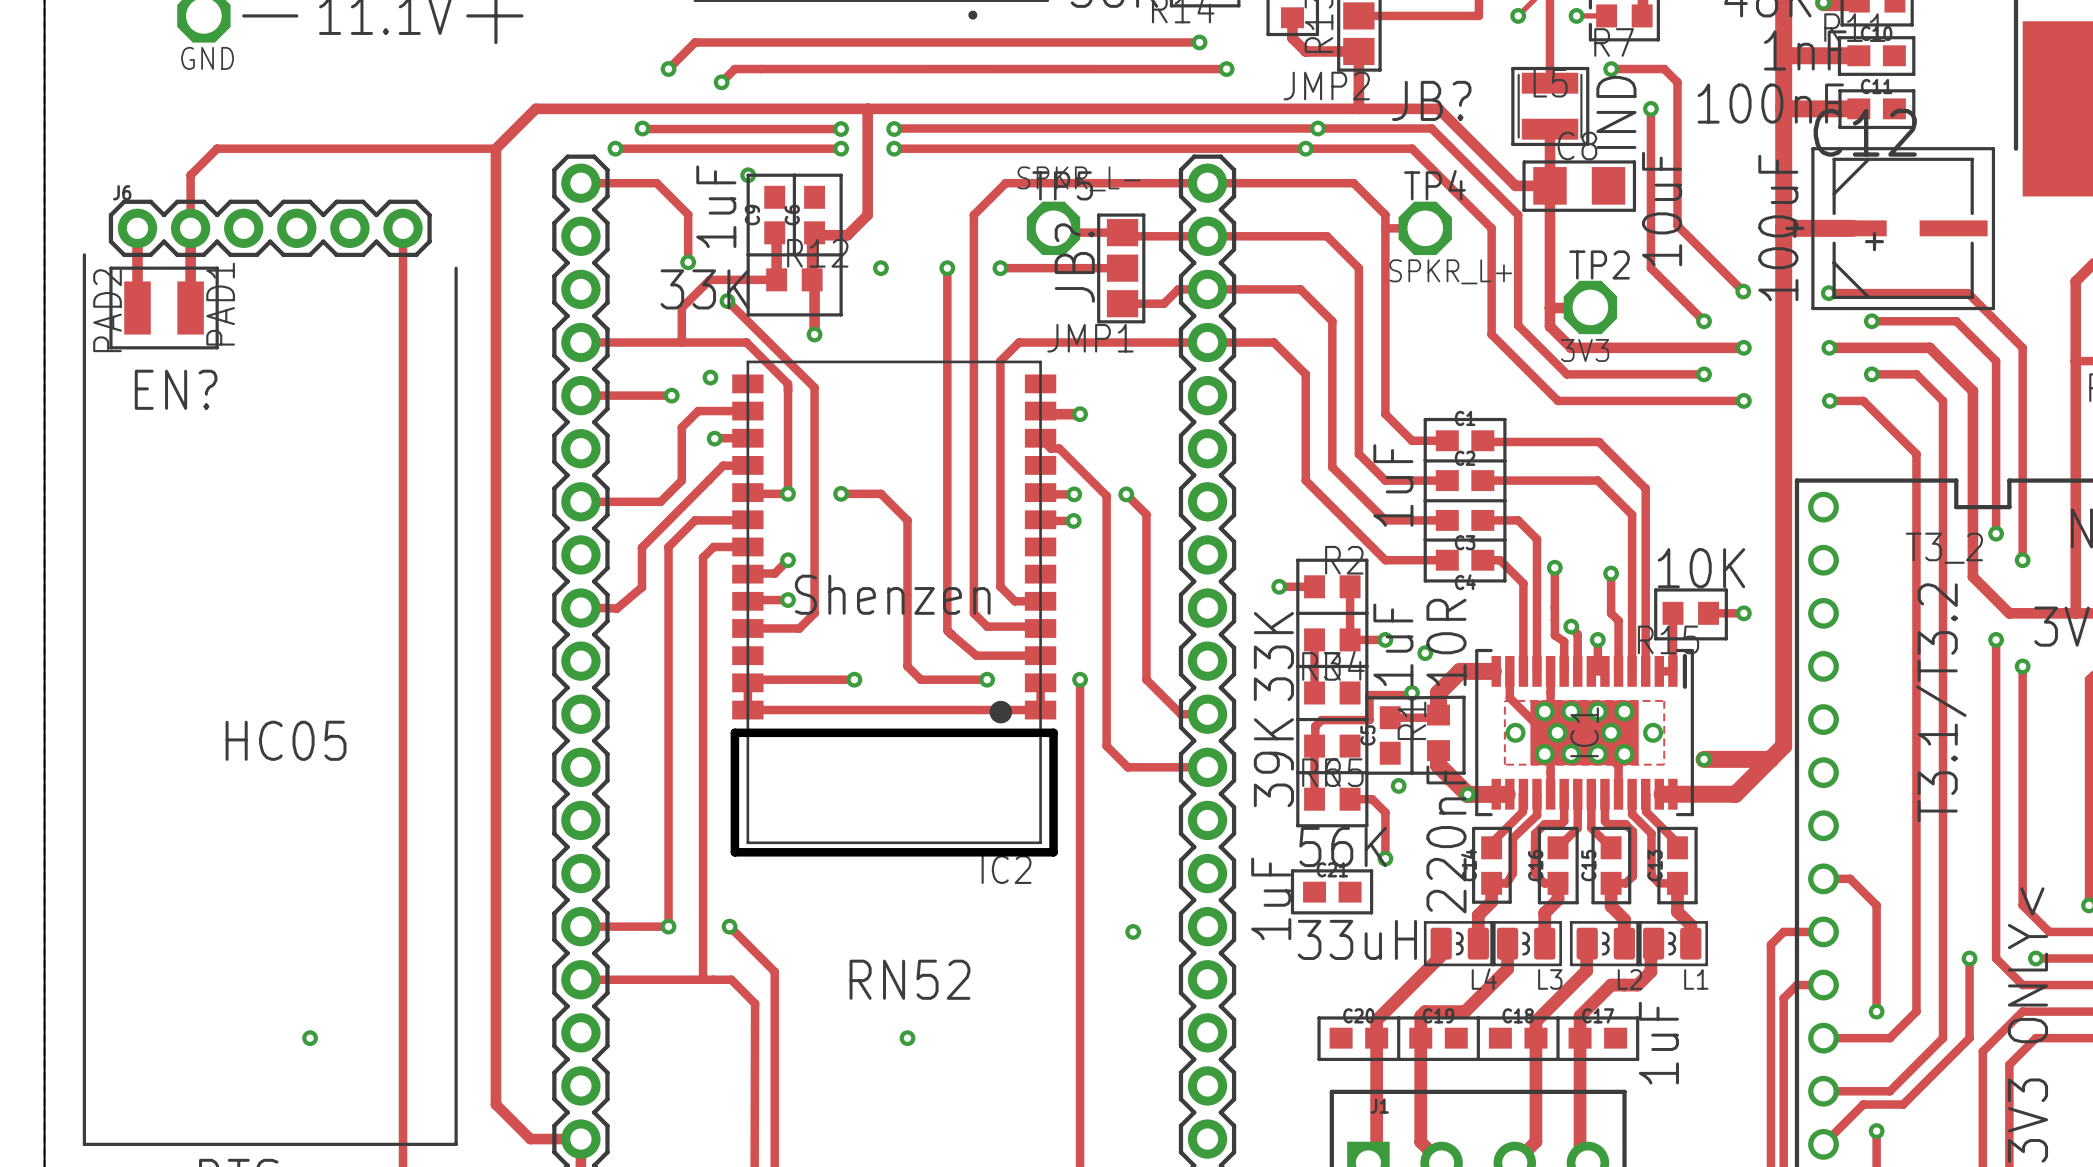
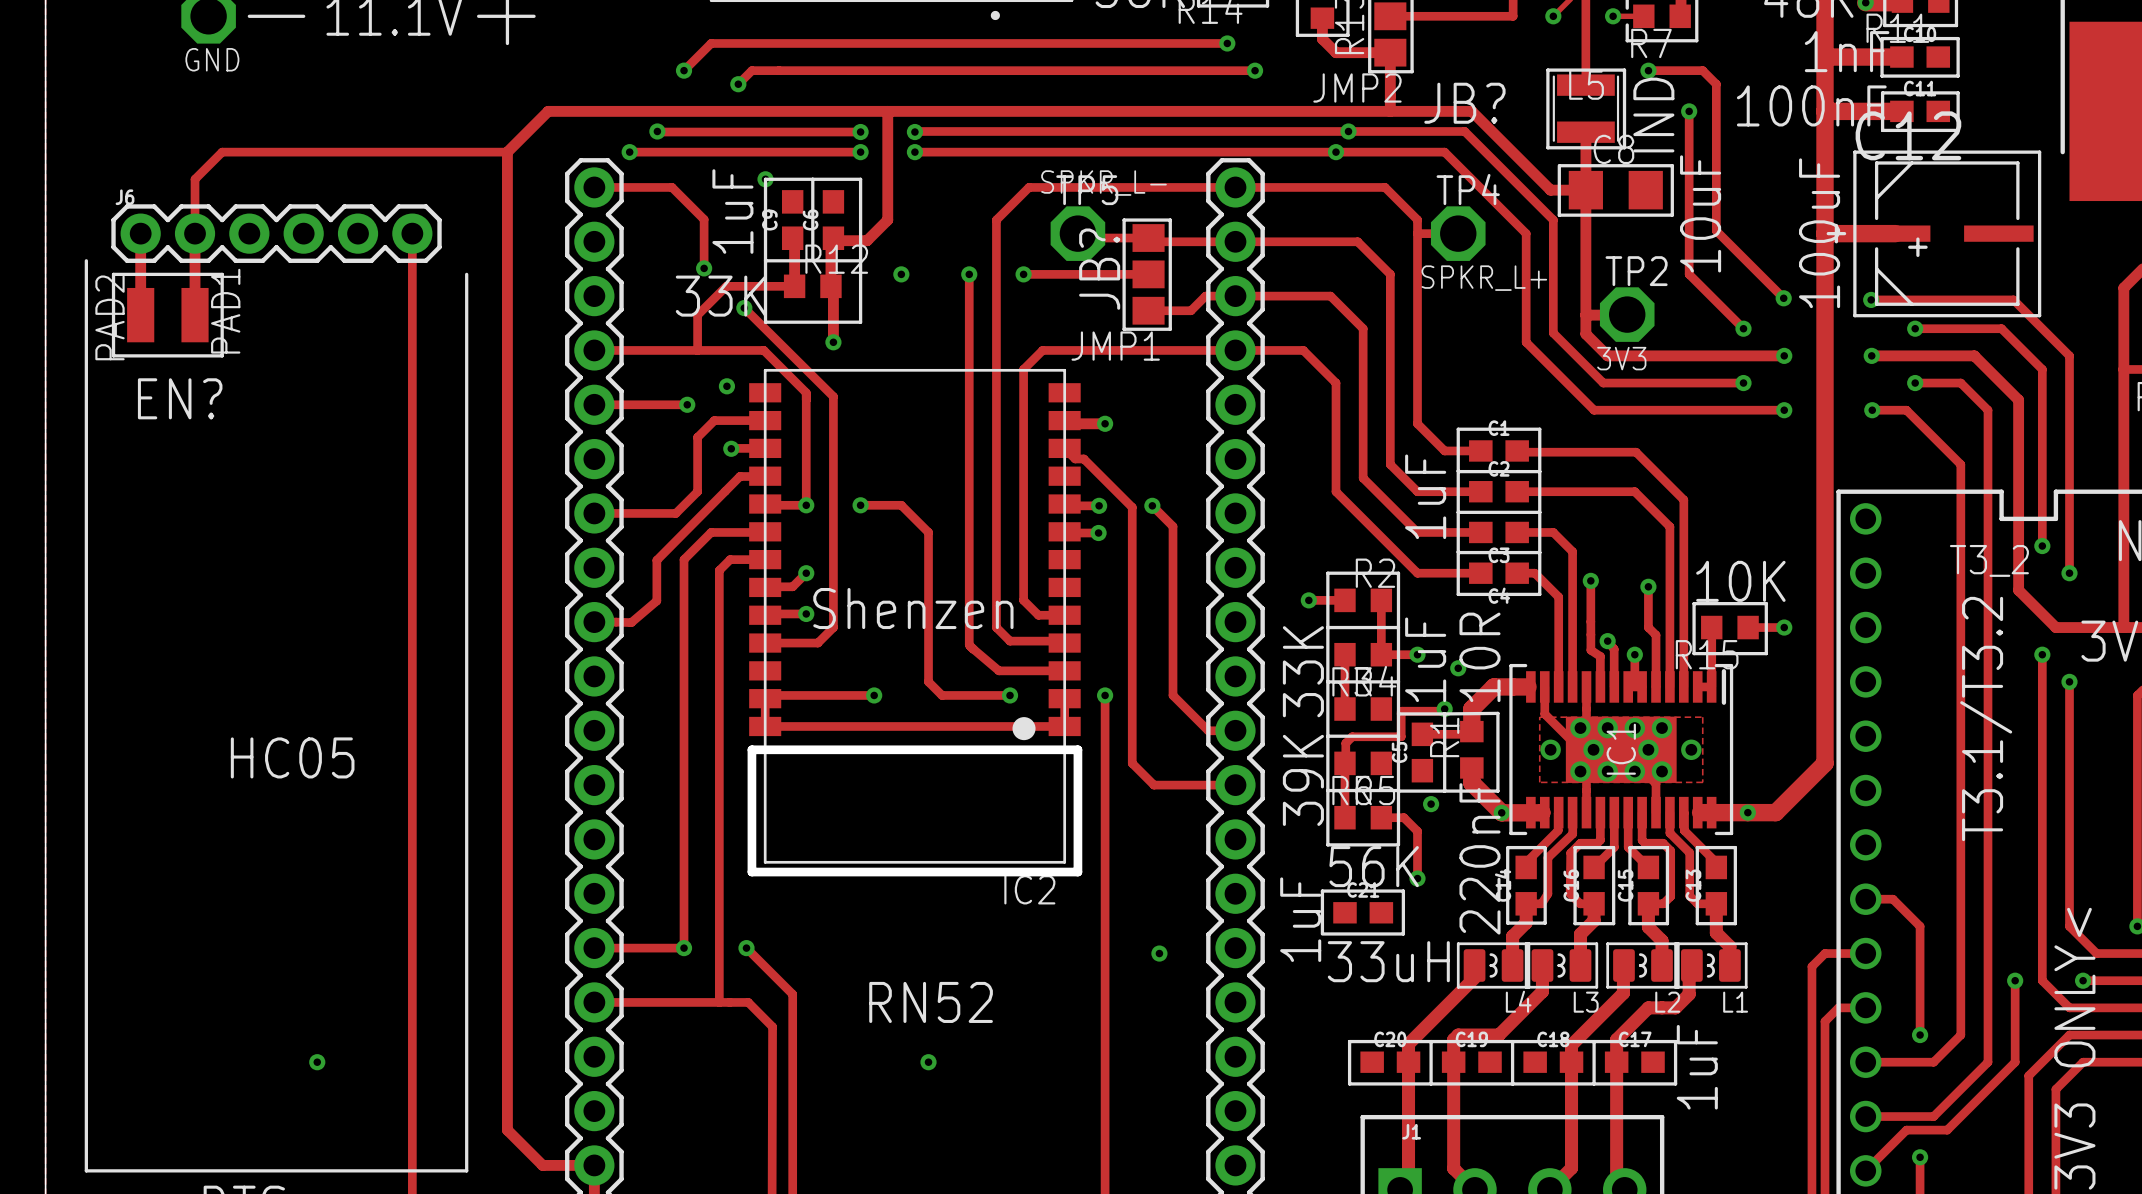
track: (1704, 759) (1770, 759) -> none
via position: (1704, 759) -> (1747, 812)

